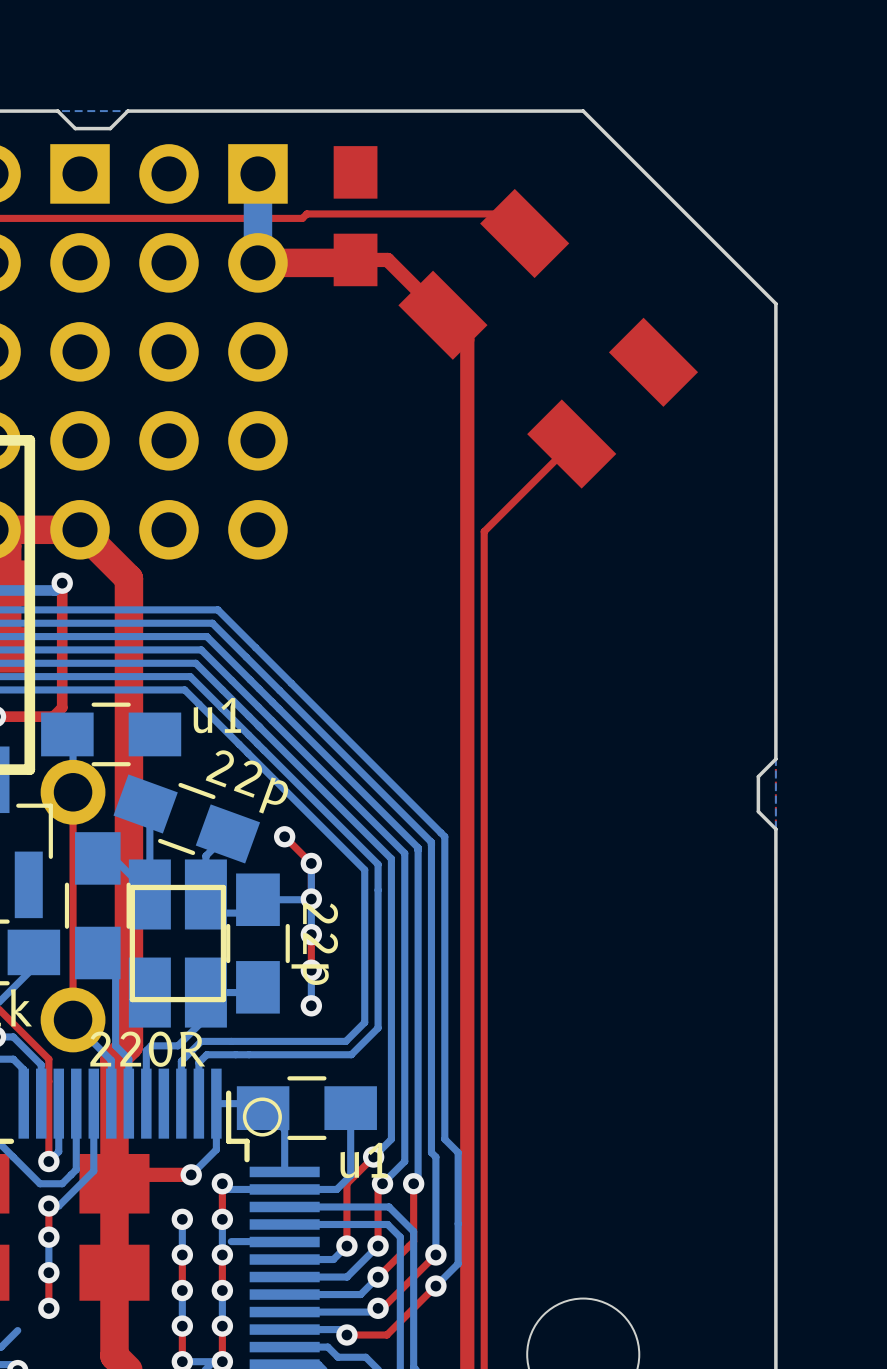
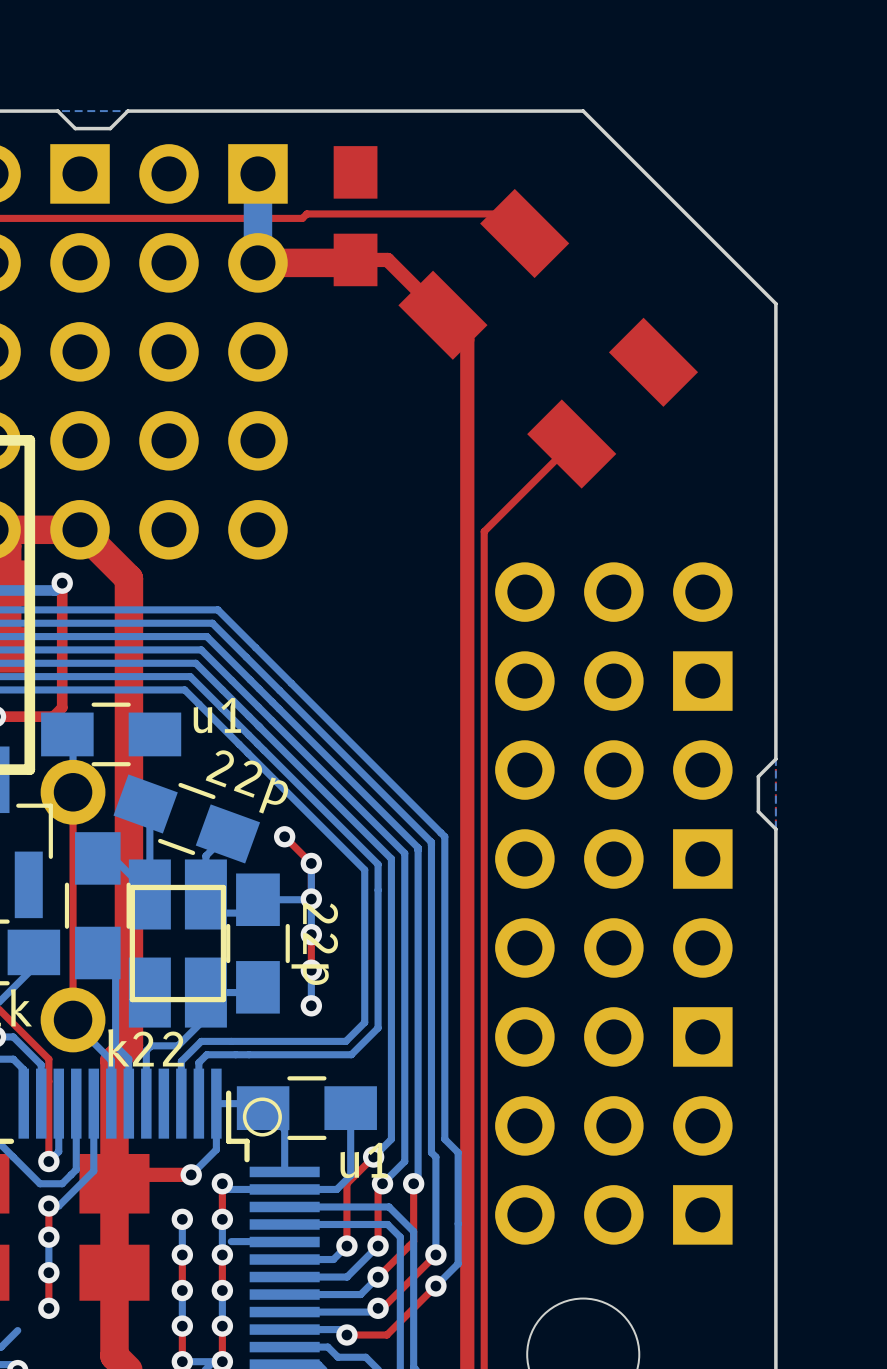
part: none -> (613, 636)
part: none -> (613, 814)
part: none -> (613, 992)
part value: 220R (147, 1049) -> k22 (146, 1047)
part: none -> (613, 1170)

